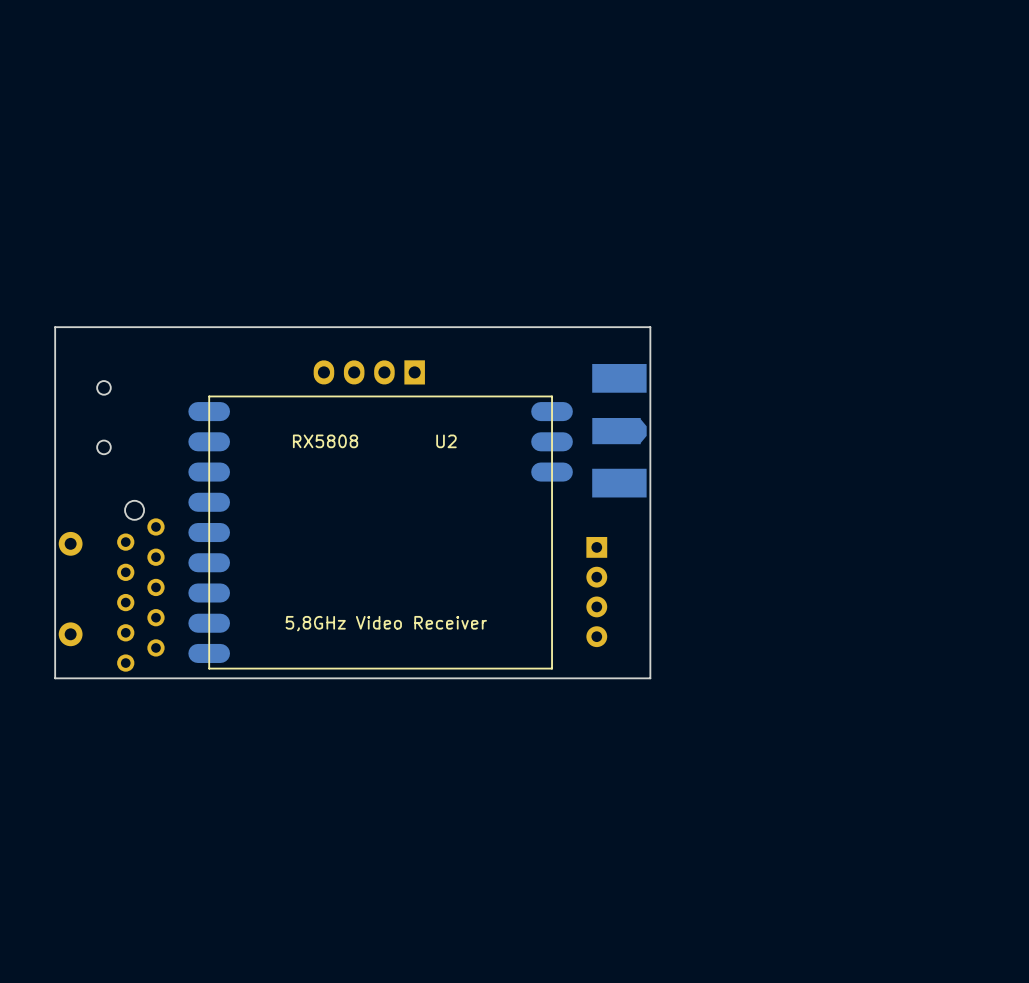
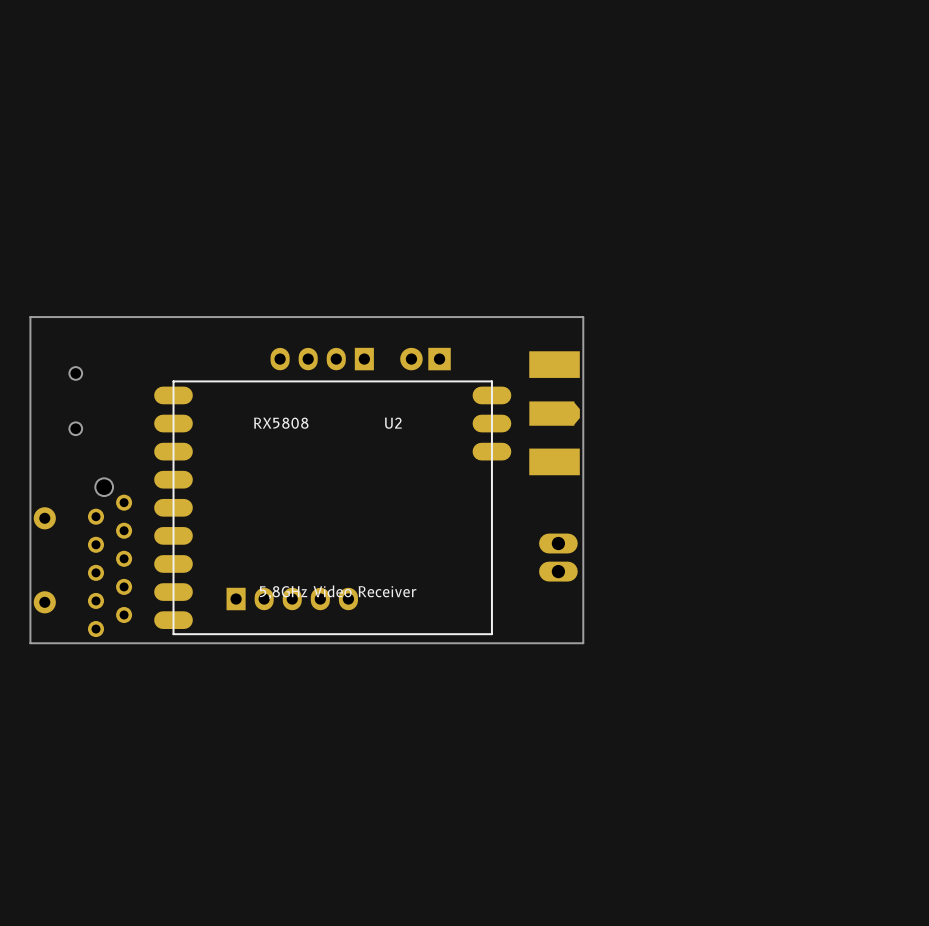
part: none -> (425, 359)
part: none -> (558, 557)
part: (596, 592) -> none
part: none -> (292, 599)

